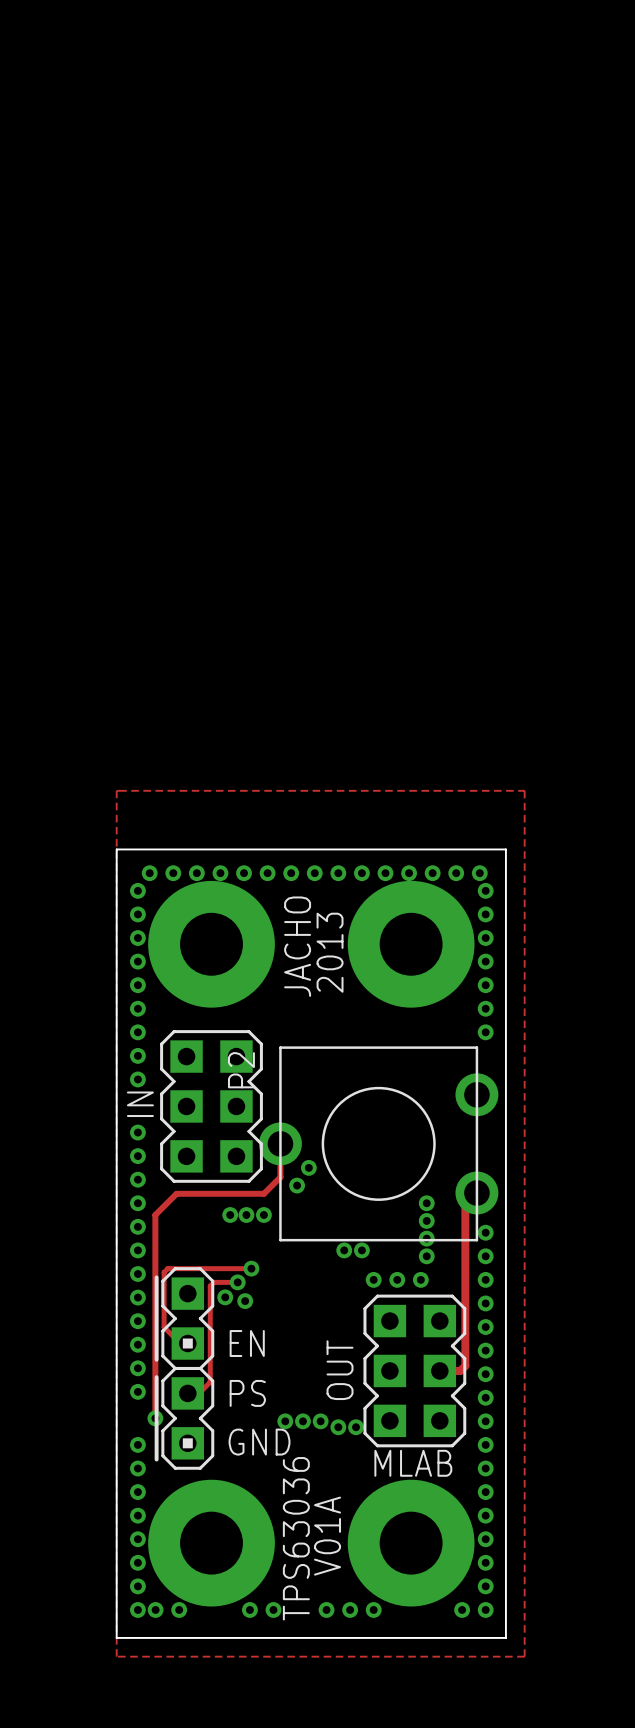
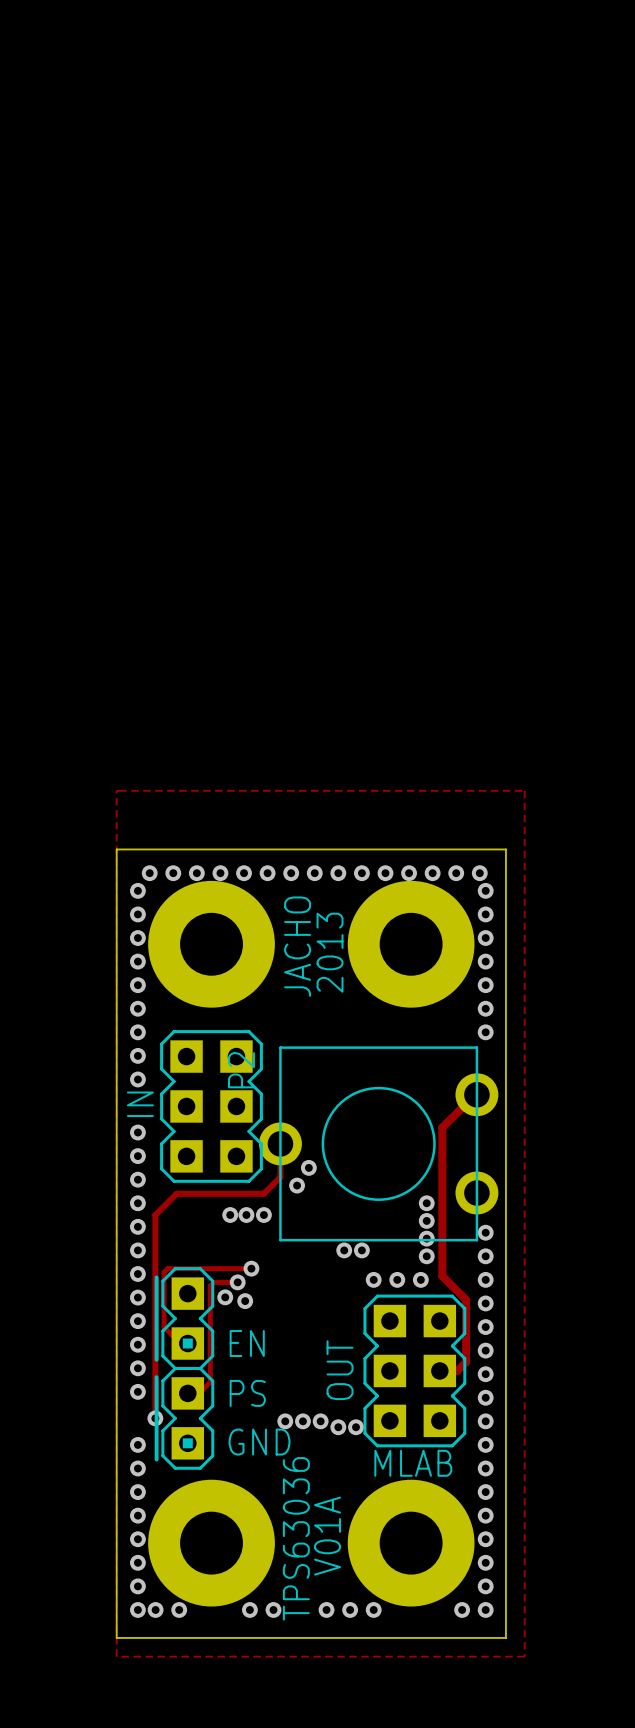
track: (476, 1193) (465, 1204) (465, 1365) (460, 1370) (457, 1370) -> (476, 1094) (442, 1127) (442, 1276) (466, 1299) (466, 1362) (457, 1370)

